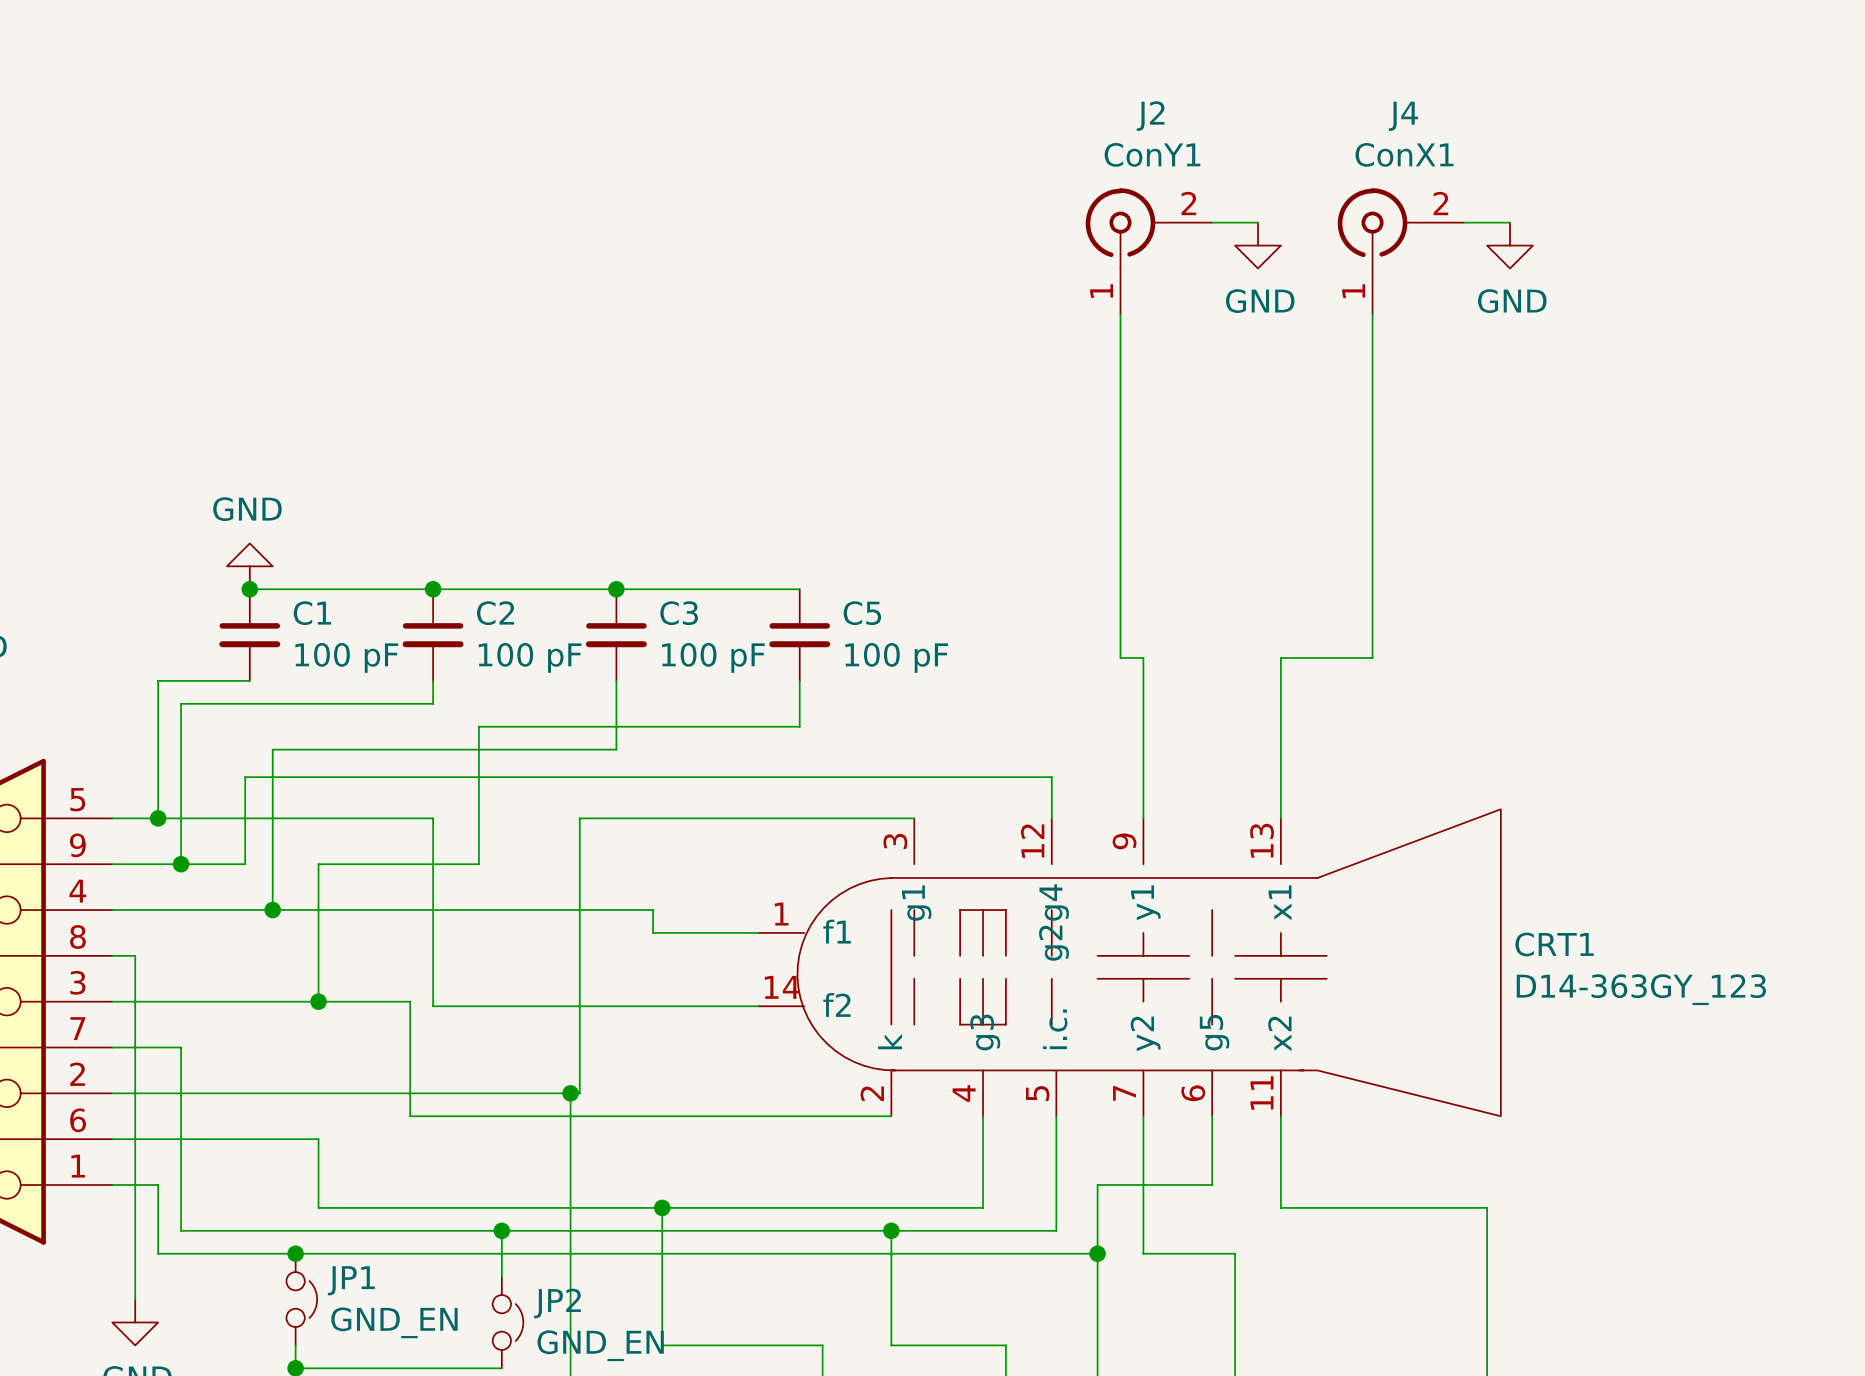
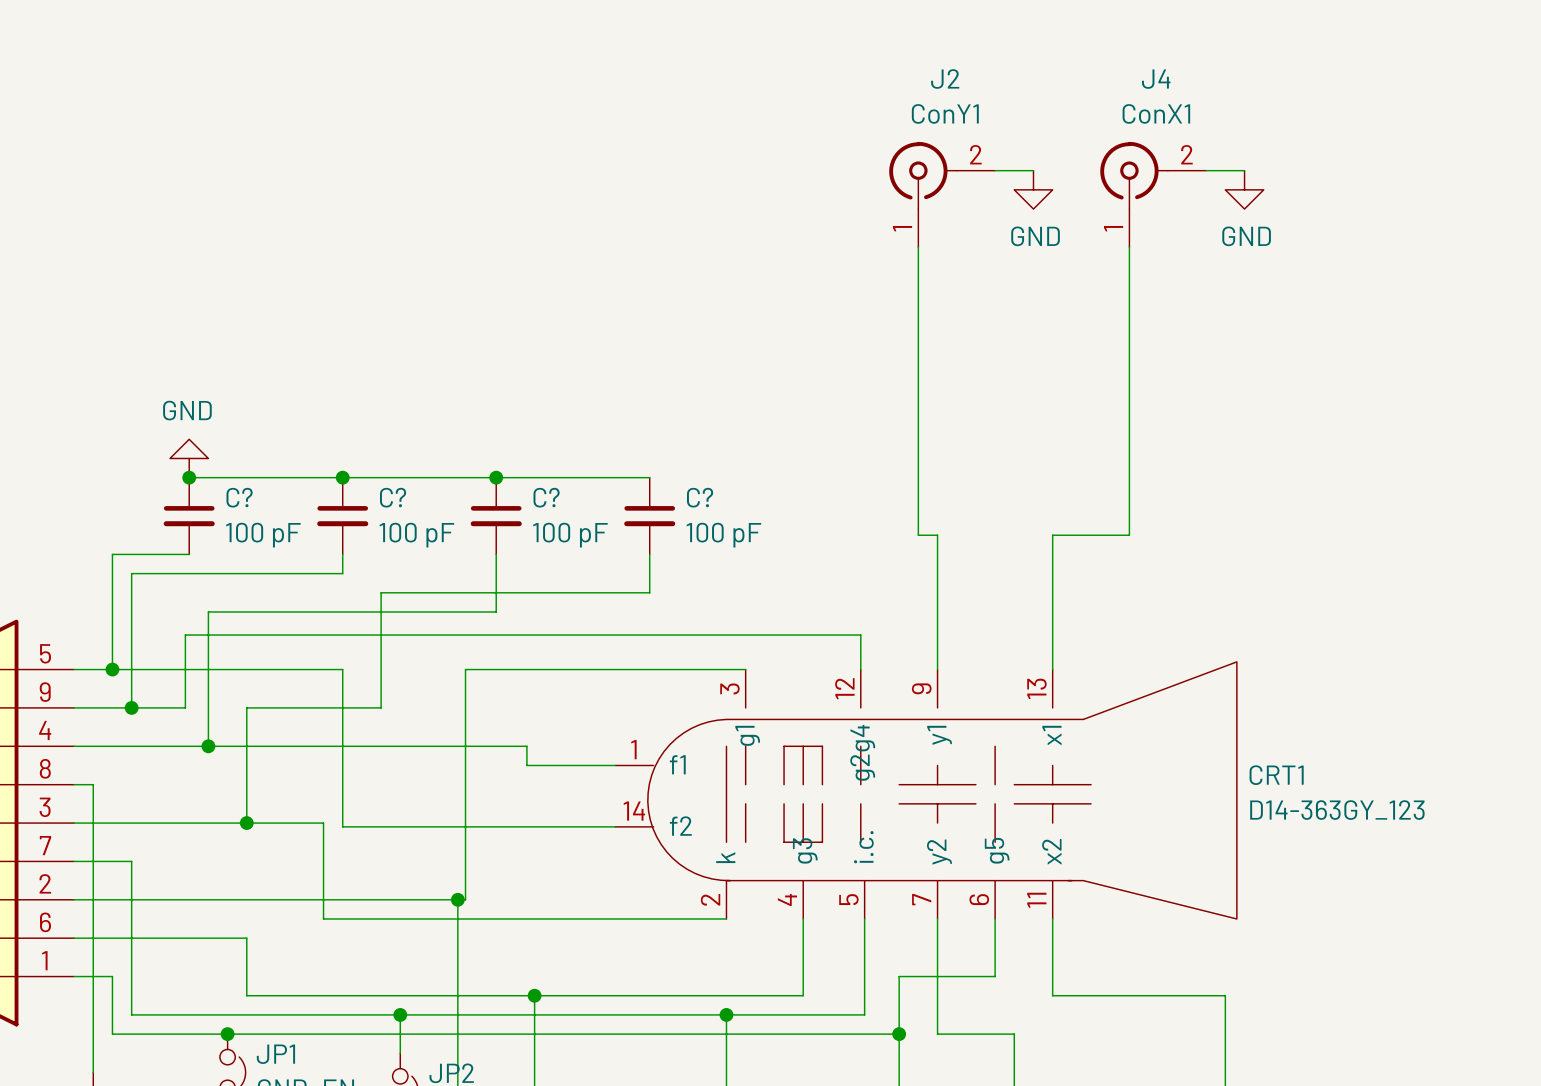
C1 name: C1 (312, 613) -> C? (239, 497)
C2 name: C2 (495, 613) -> C? (393, 497)
C3 name: C3 (679, 613) -> C? (546, 497)
C5 name: C5 (862, 613) -> C? (700, 497)

